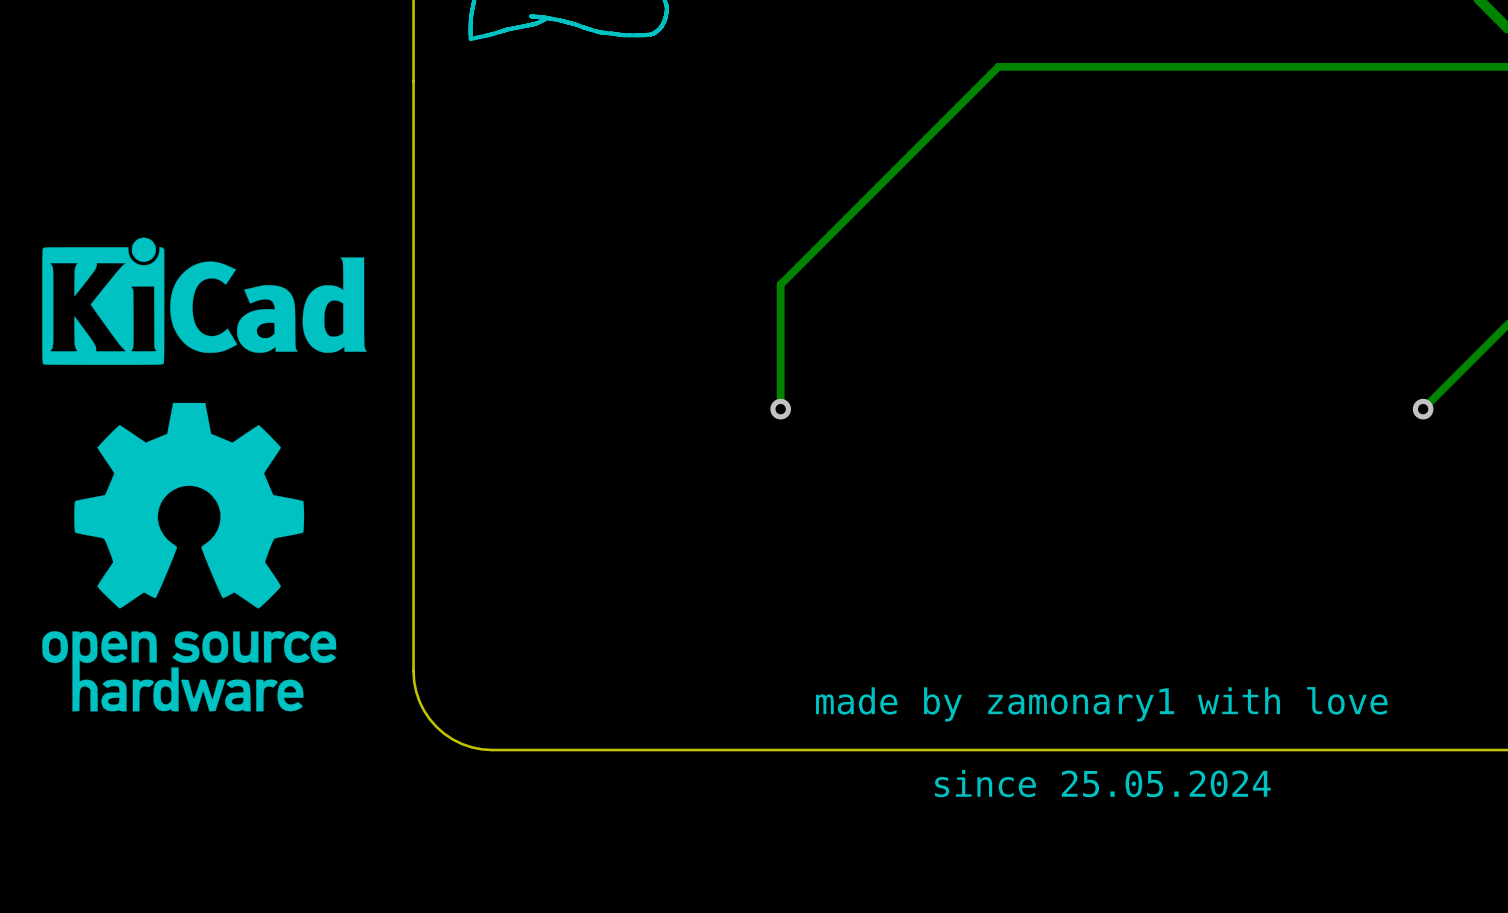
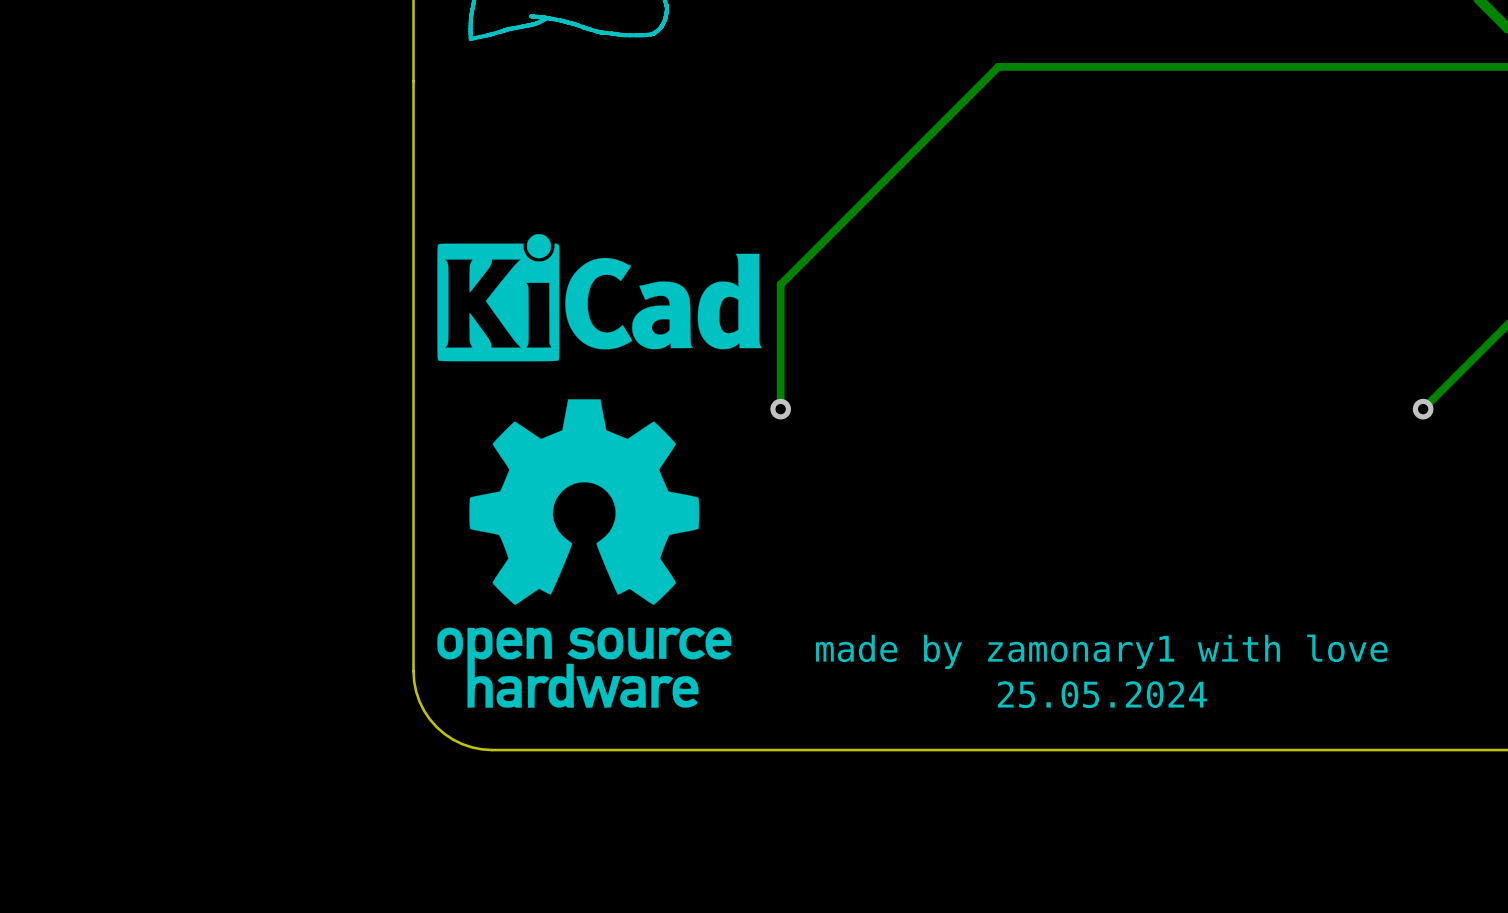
drawing position: (204, 301) -> (599, 297)
drawing position: (189, 557) -> (584, 553)
text: none -> 25.05.2024 (1102, 694)
text position: made by zamonary1 with love (1101, 704) -> made by zamonary1 with love (1101, 651)
text: since 25.05.2024 (1102, 783) -> none

